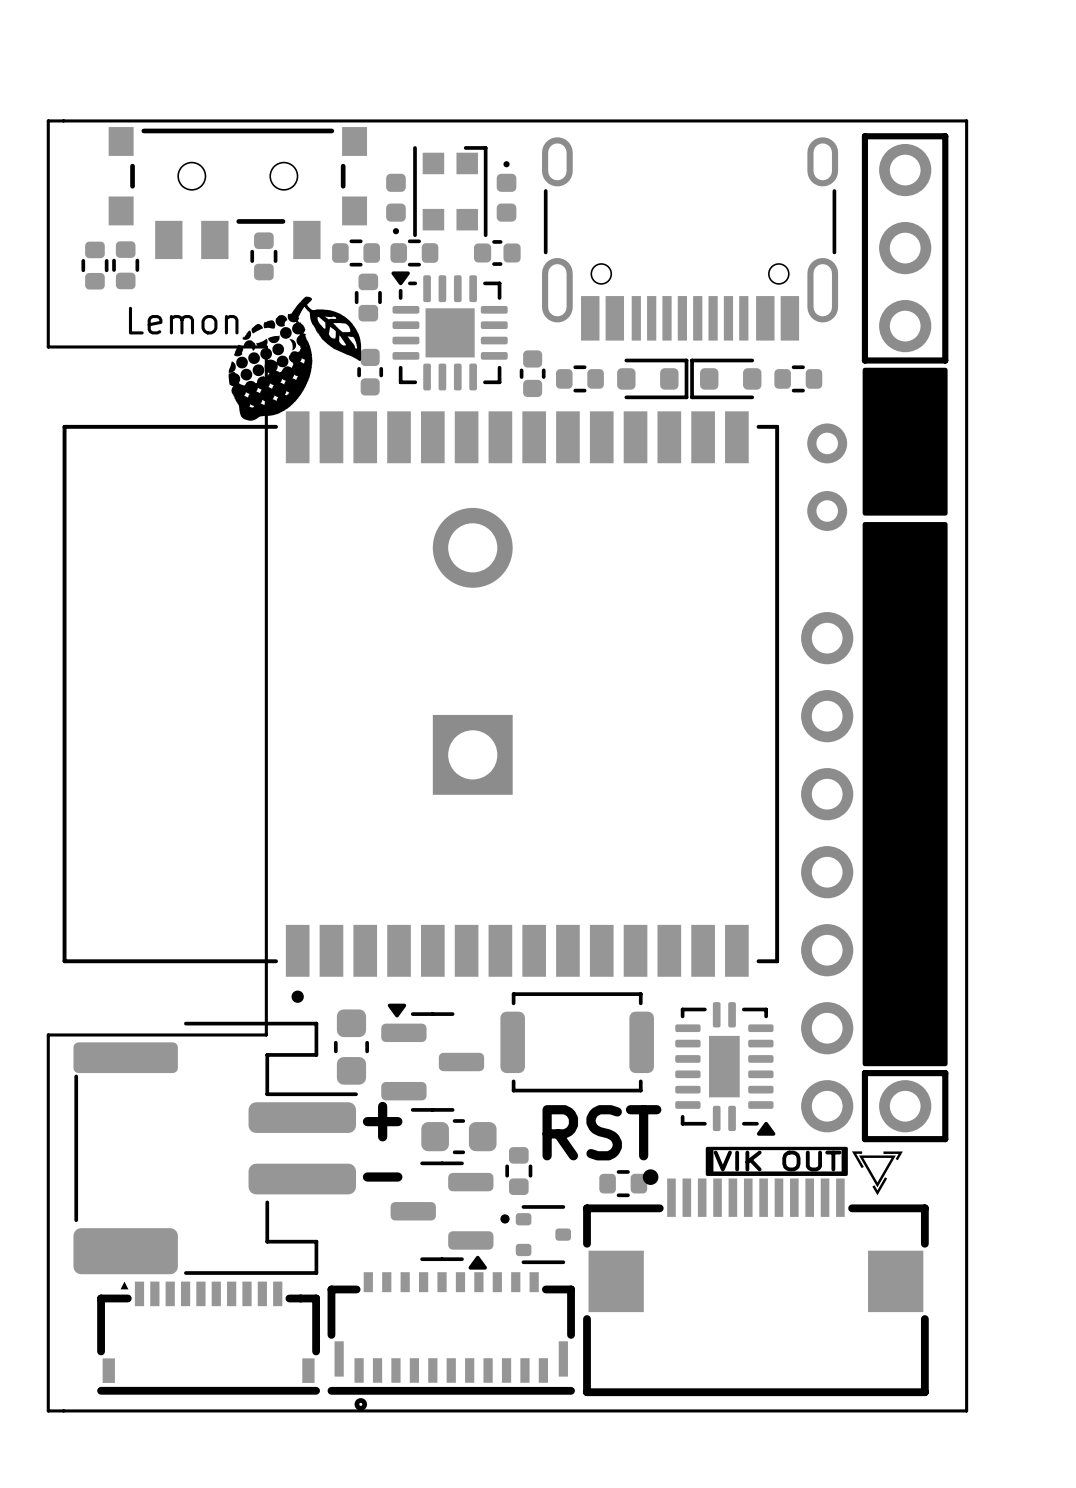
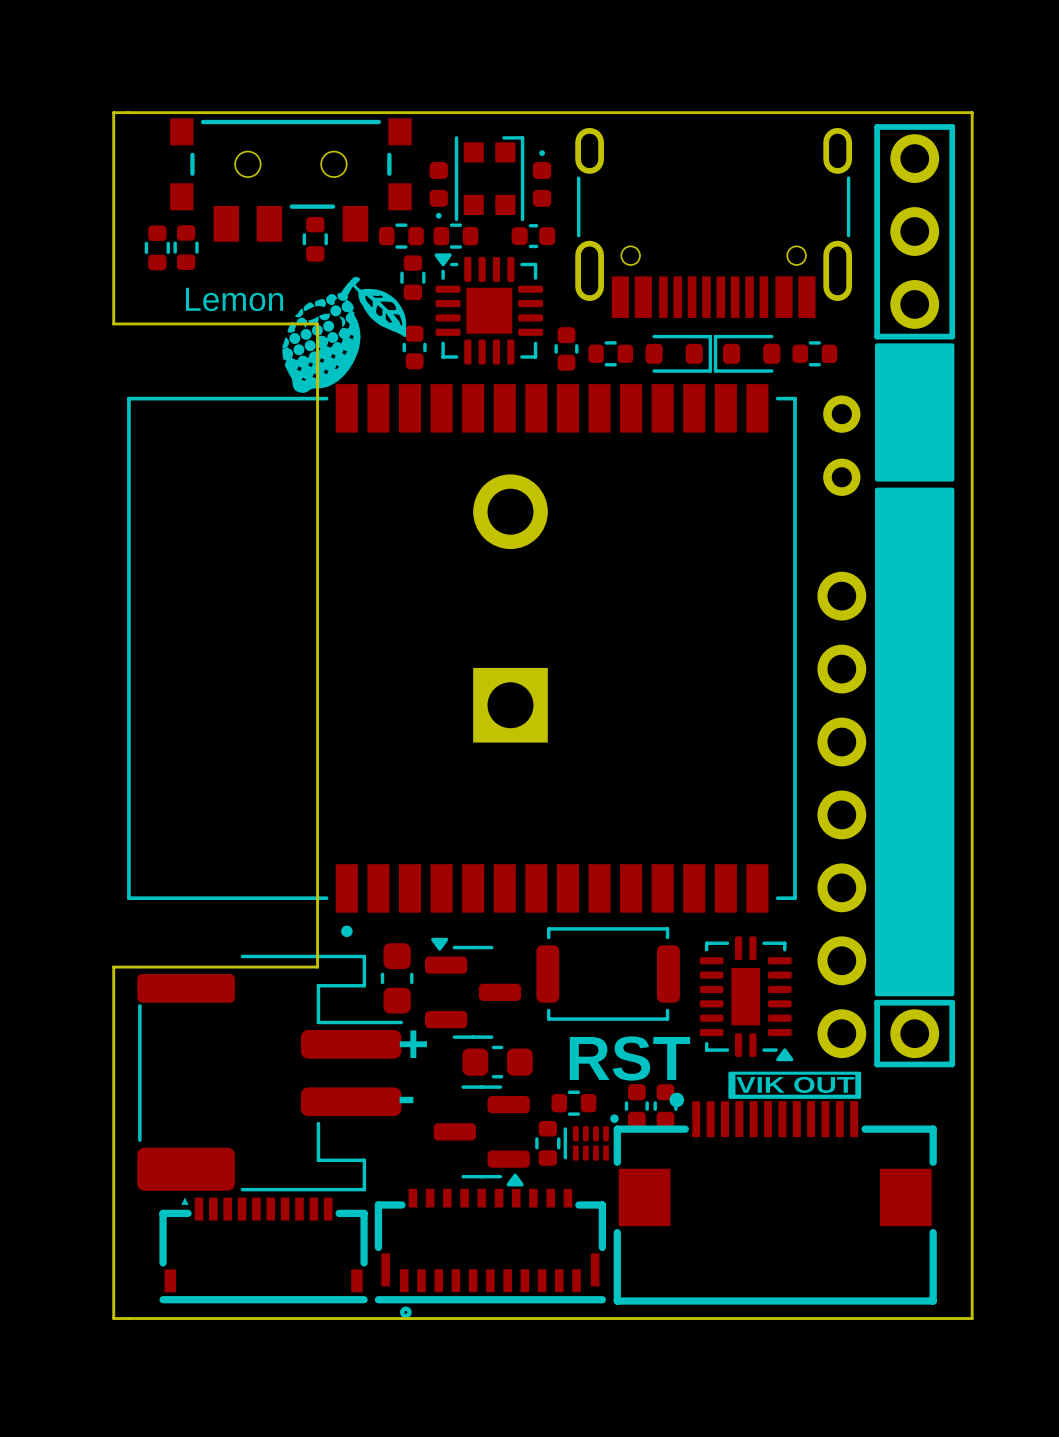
drawing: [851, 1151, 903, 1196] -> none
part rotation: 0° (518, 1171) -> 90° clockwise (573, 1103)
part: none -> (636, 1106)
part rotation: 0° (623, 1183) -> 90° clockwise (547, 1143)
part position: (623, 1183) -> (547, 1143)
part: none -> (665, 1106)
part: none -> (591, 1137)
part: (535, 1234) -> none

